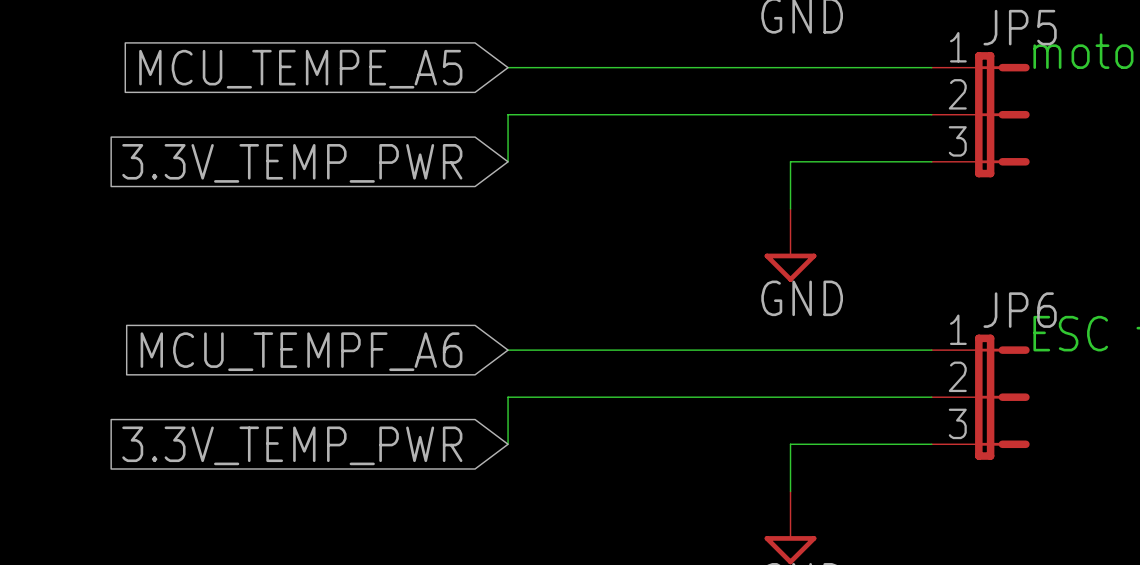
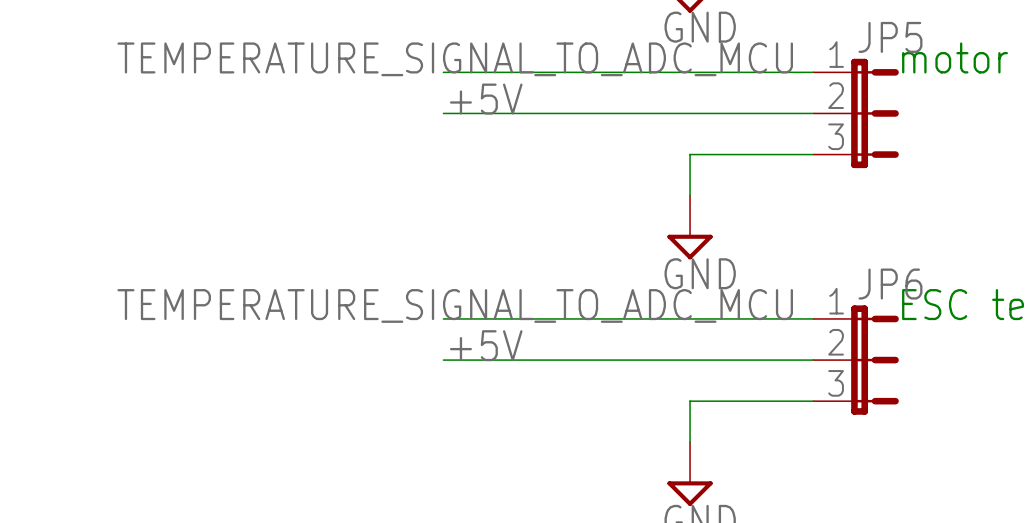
label: none -> TEMPERATURE_SIGNAL_TO_ADC_MCU (455, 59)
global label: MCU_TEMPE_A5 (300, 69) -> none
label: none -> +5V (486, 99)
wire: (508, 114) (508, 161) -> none
global label: 3.3V_TEMP_PWR (292, 163) -> none
label: none -> TEMPERATURE_SIGNAL_TO_ADC_MCU (455, 305)
global label: MCU_TEMPF_A6 (301, 351) -> none
label: none -> +5V (486, 345)
wire: (508, 397) (508, 444) -> none
global label: 3.3V_TEMP_PWR (292, 445) -> none

